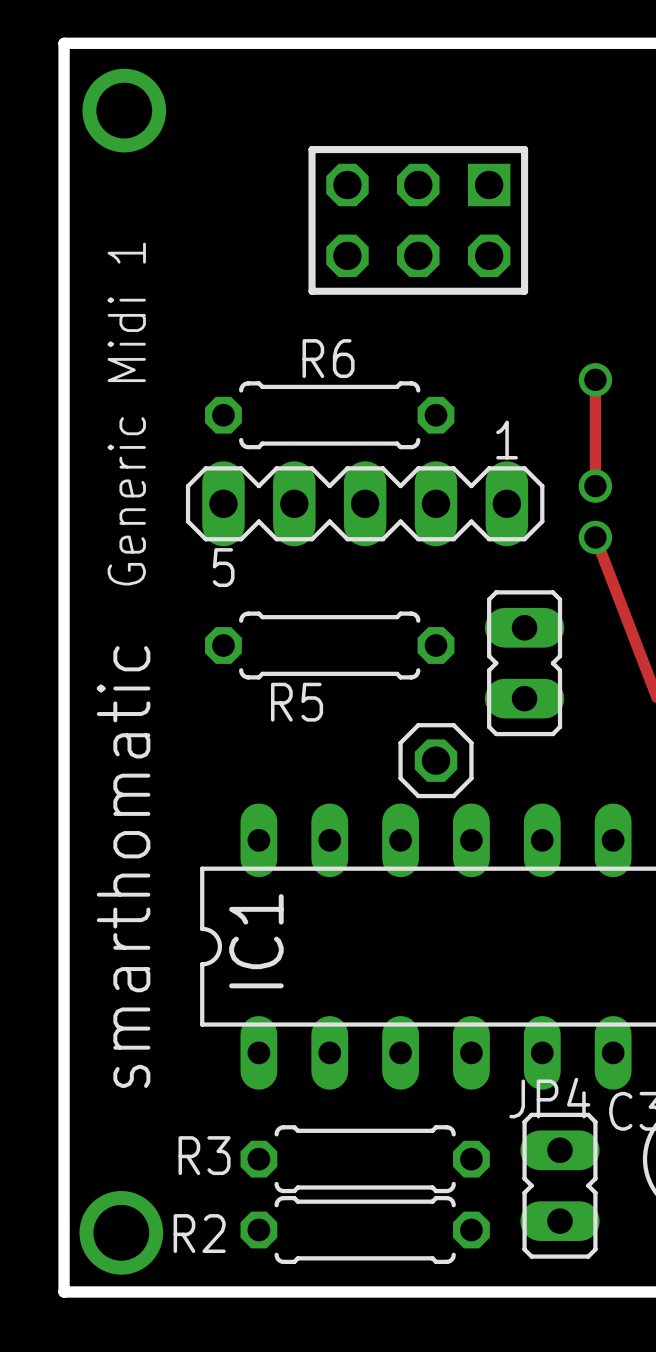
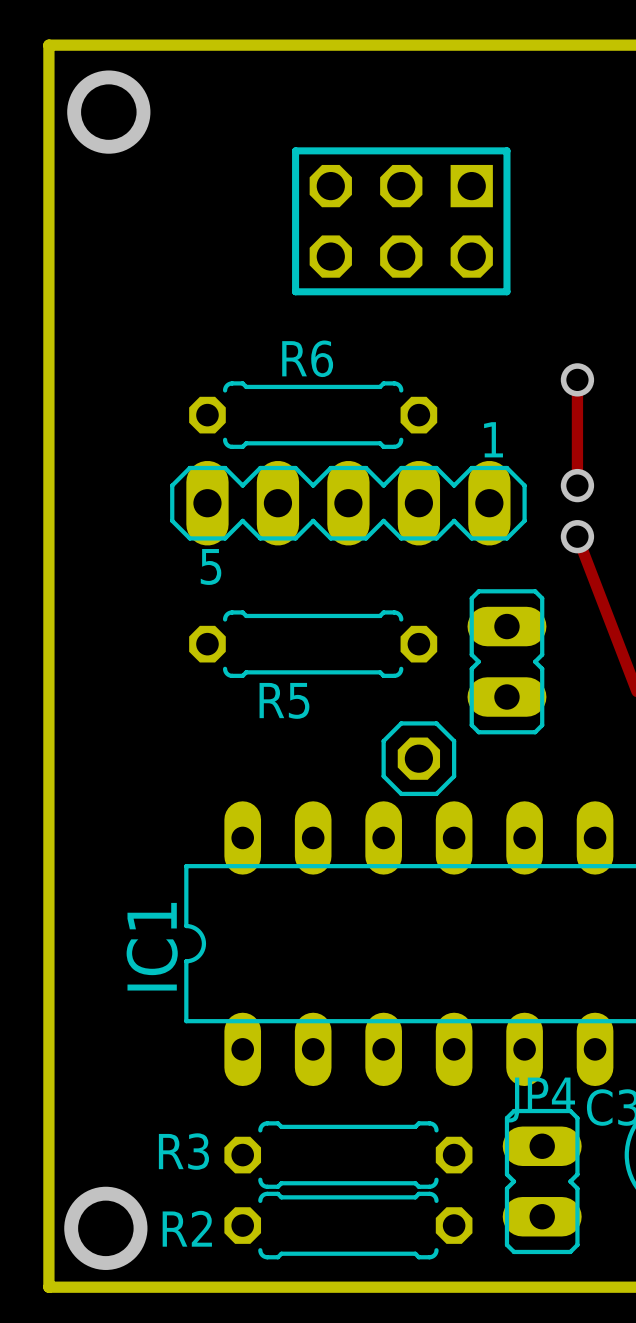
text: Generic Midi 1 (126, 414) -> none
text: smarthomatic (123, 867) -> none
IC1 name position: IC1 (256, 941) -> IC1 (152, 946)

